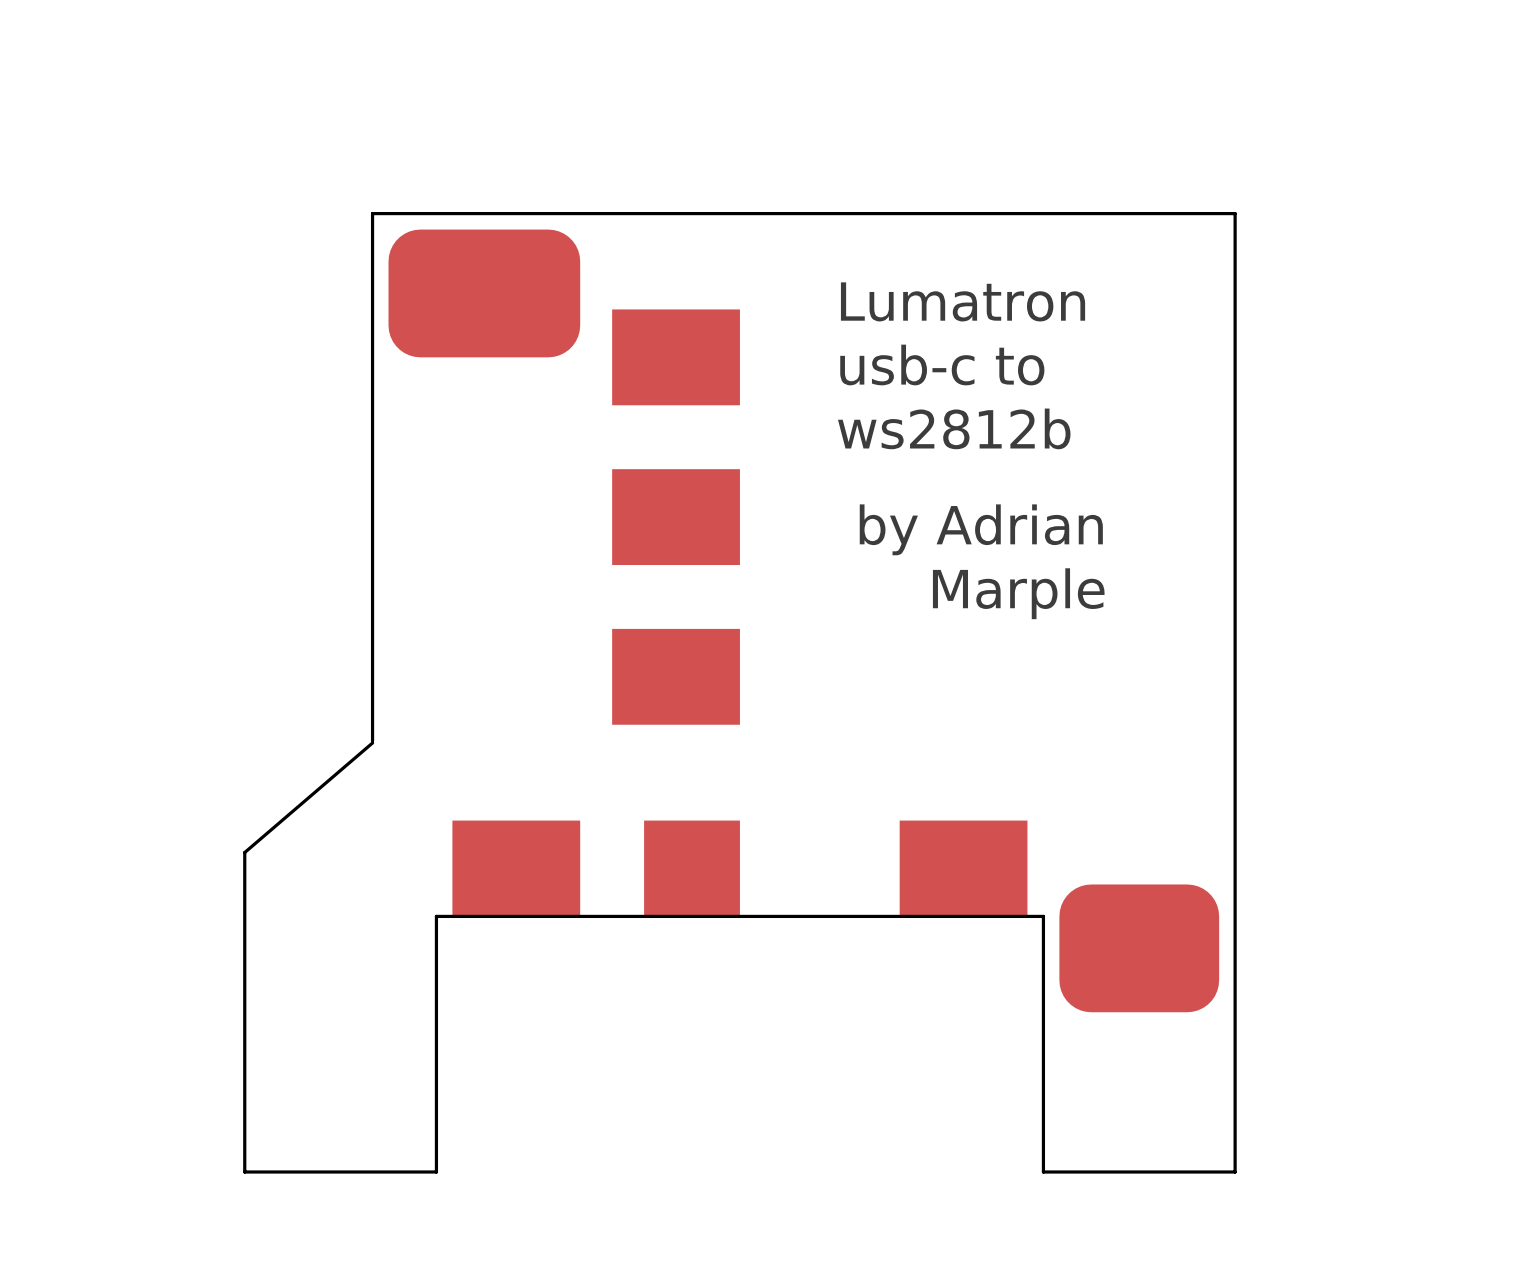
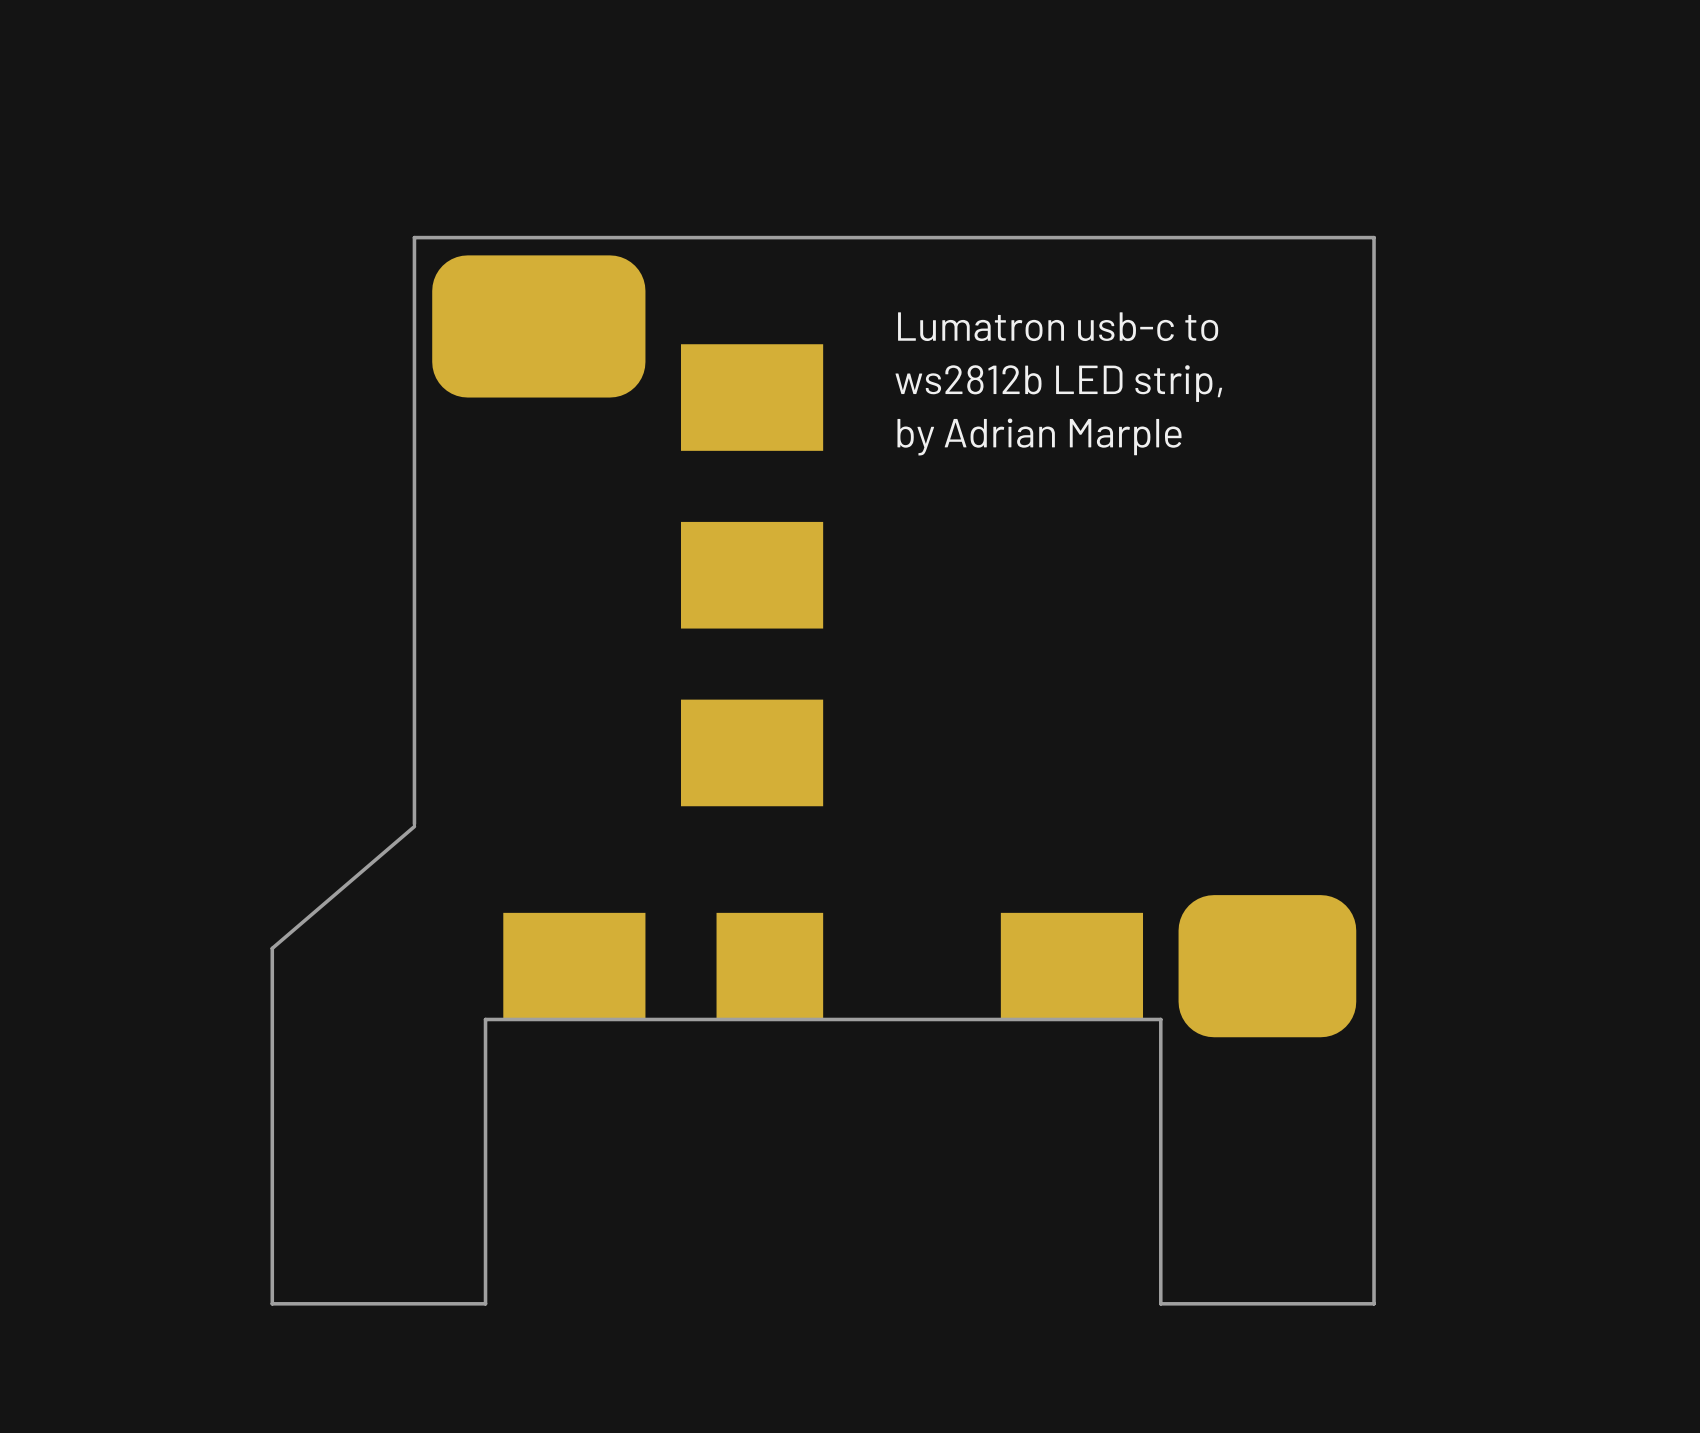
text: Lumatron (963, 301) -> Lumatron usb-c to (1058, 326)
text: none -> ws2812b LED strip, (1058, 383)
text: usb-c to (942, 365) -> none
text: none -> by Adrian Marple (1039, 437)
text: ws2812b (954, 428) -> none
text: by Adrian (981, 529) -> none
text: Marple (1018, 593) -> none
part position: (1139, 948) -> (1267, 966)

